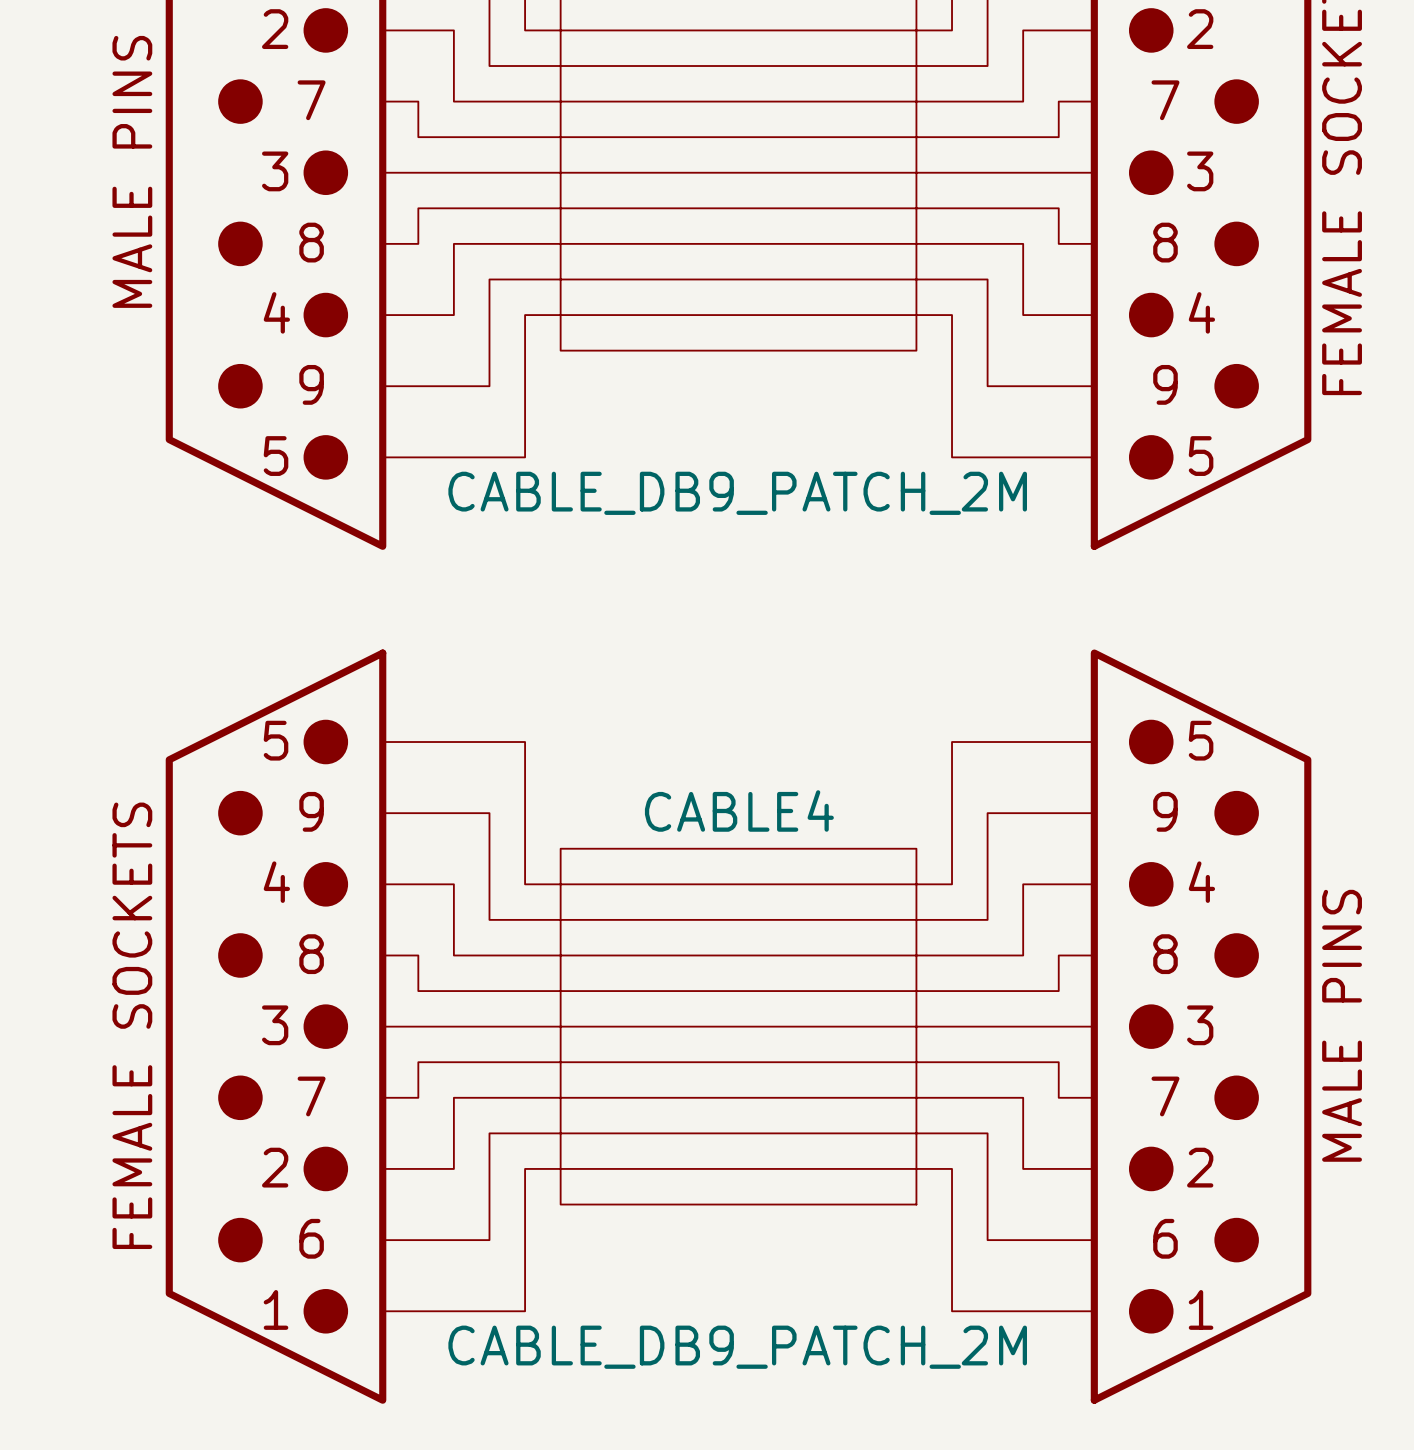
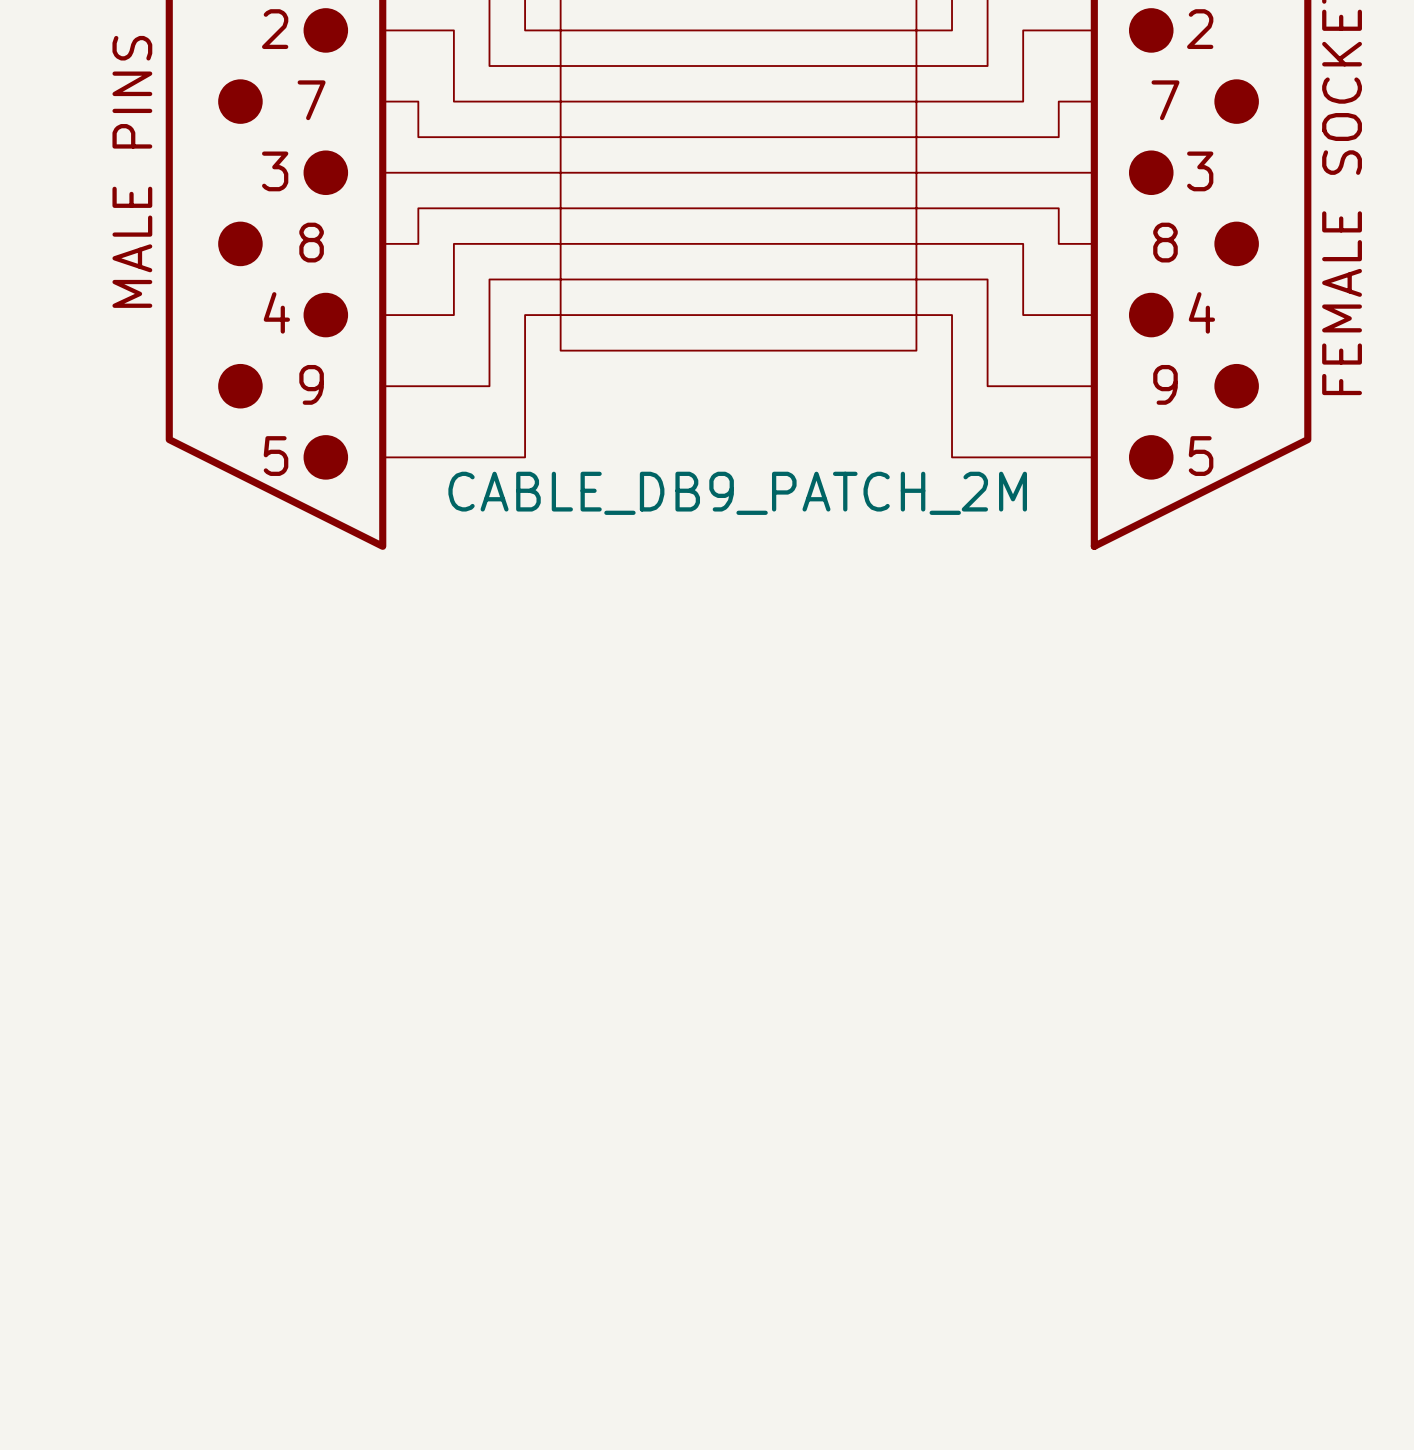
CABLE4: CABLE_DB9_PATCH_2M (738, 1026) -> none

